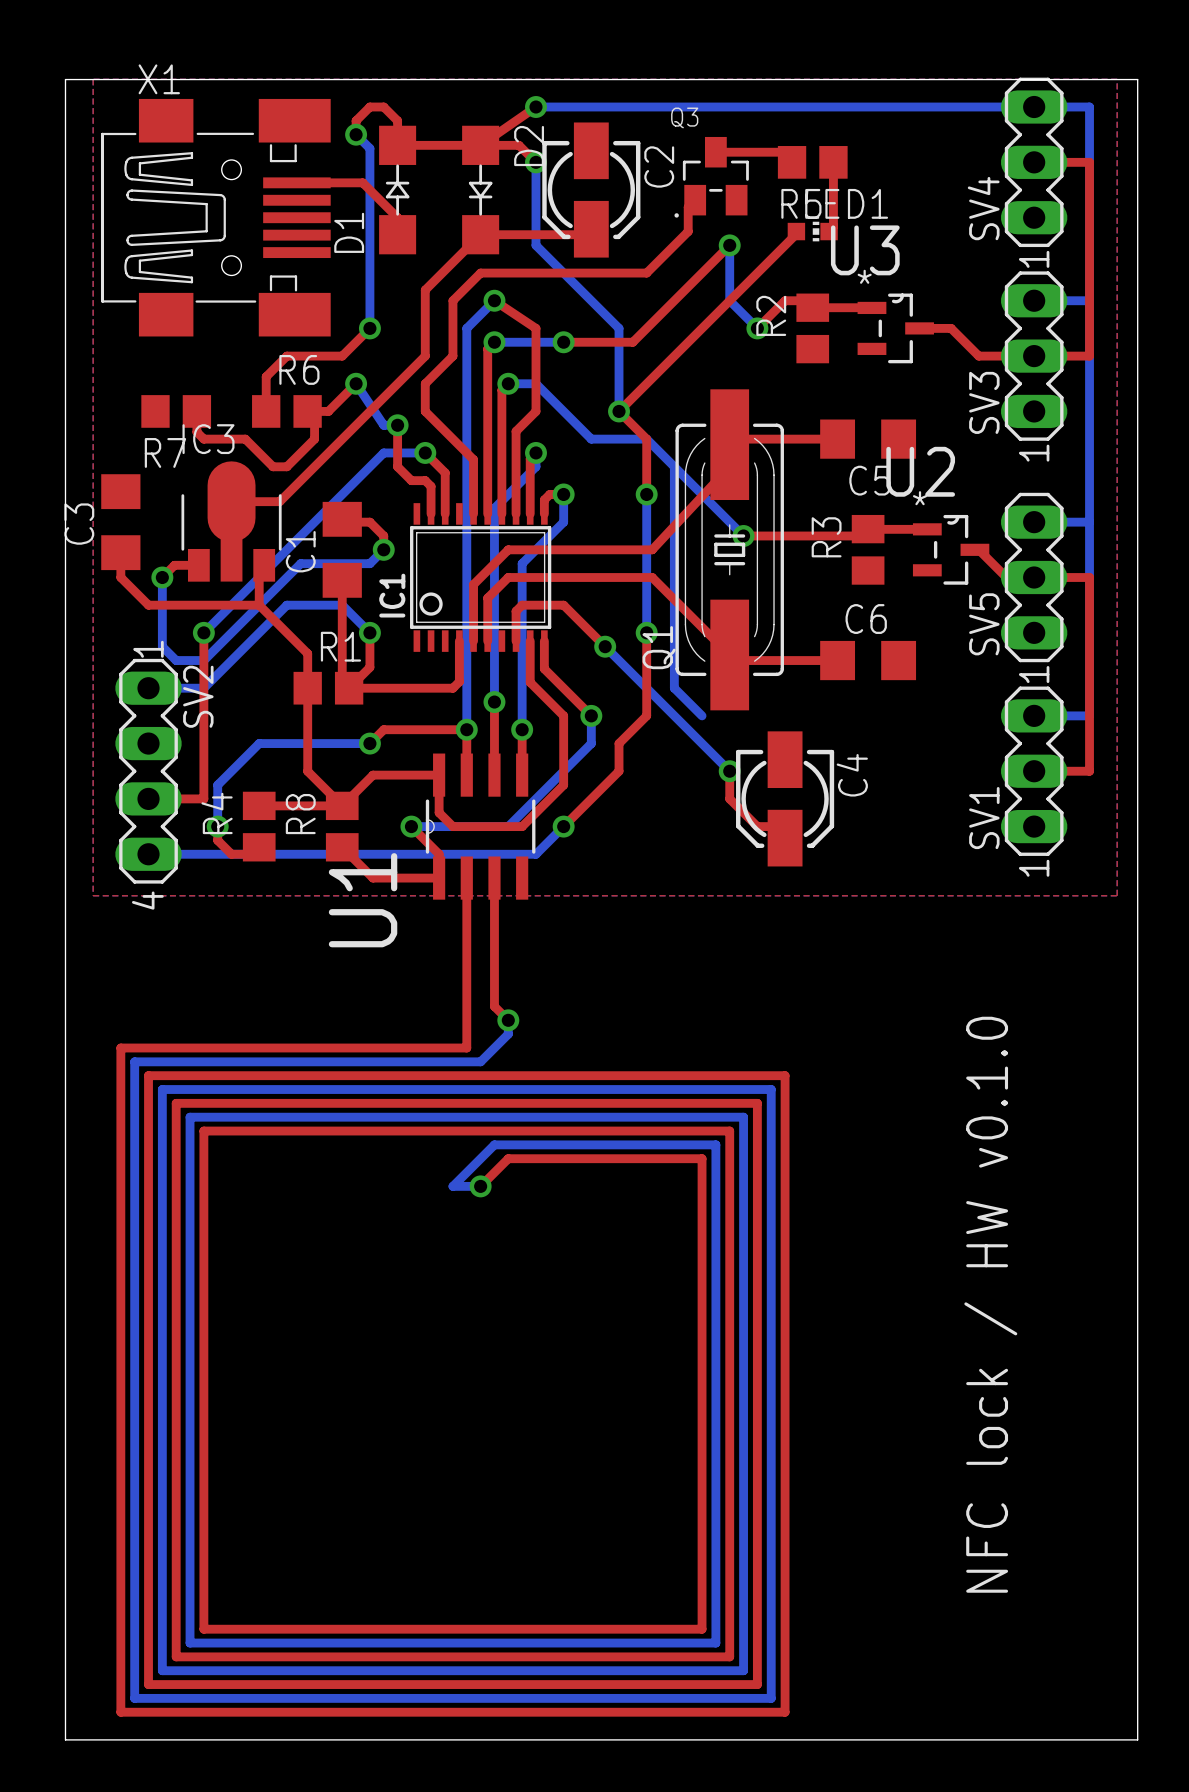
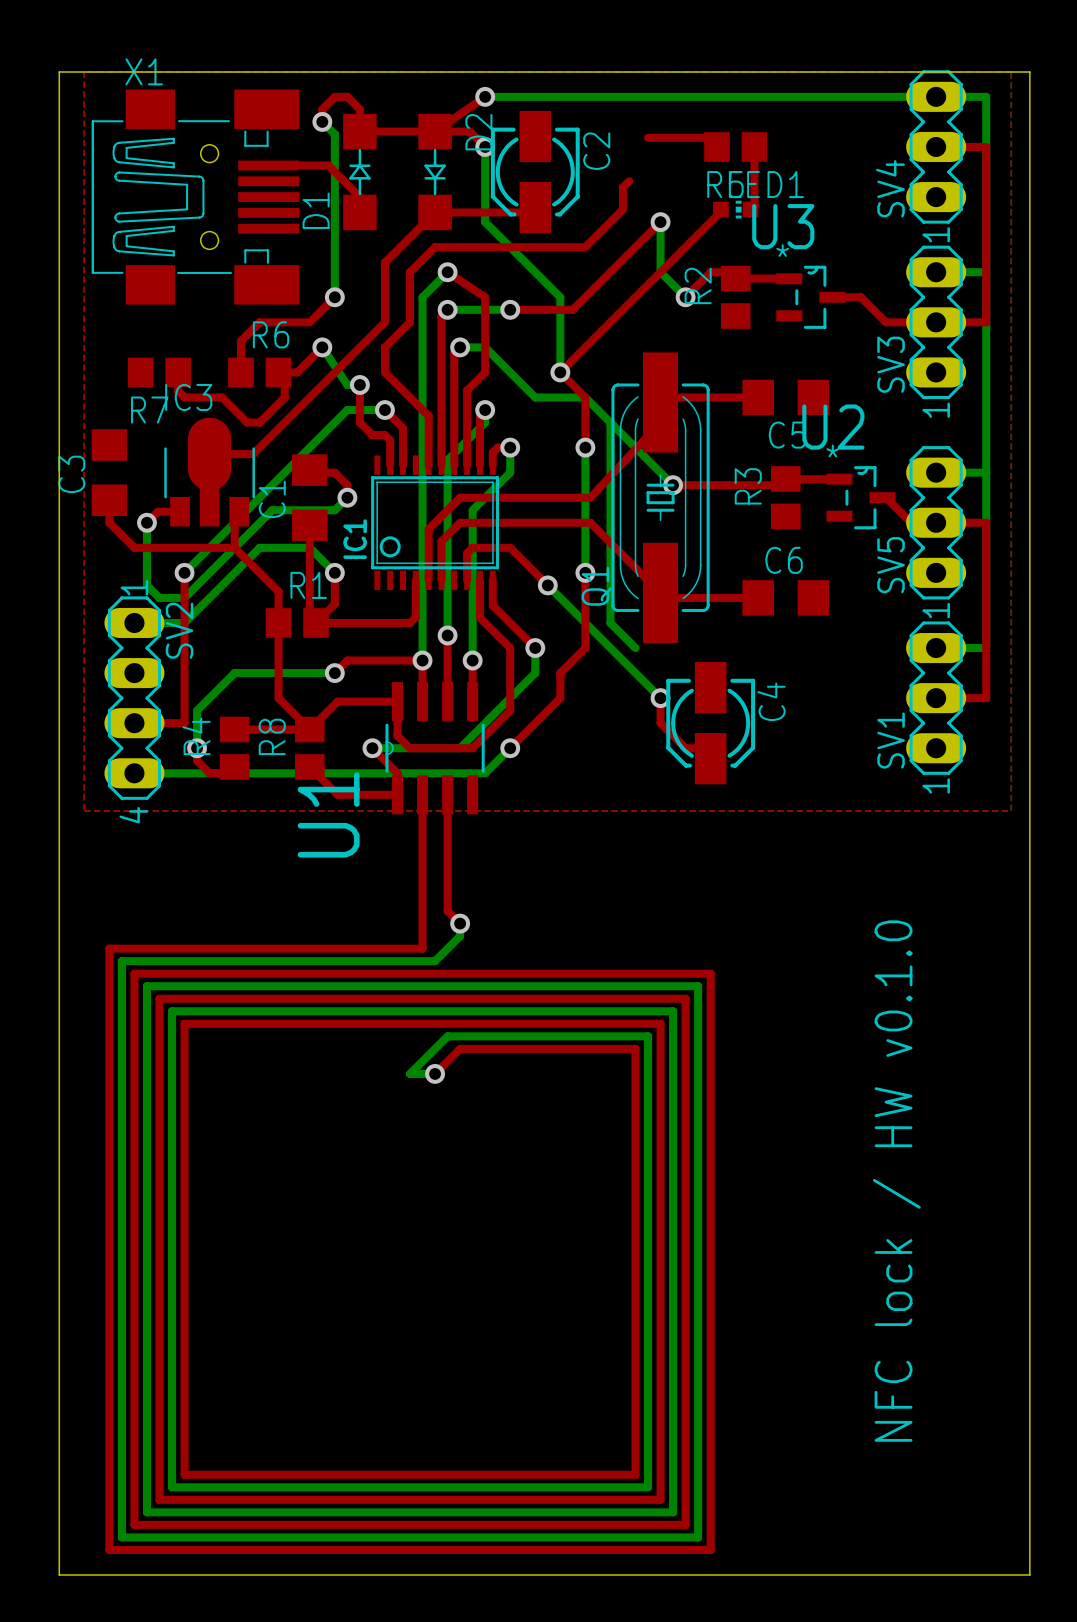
Q3: (711, 177) -> none

